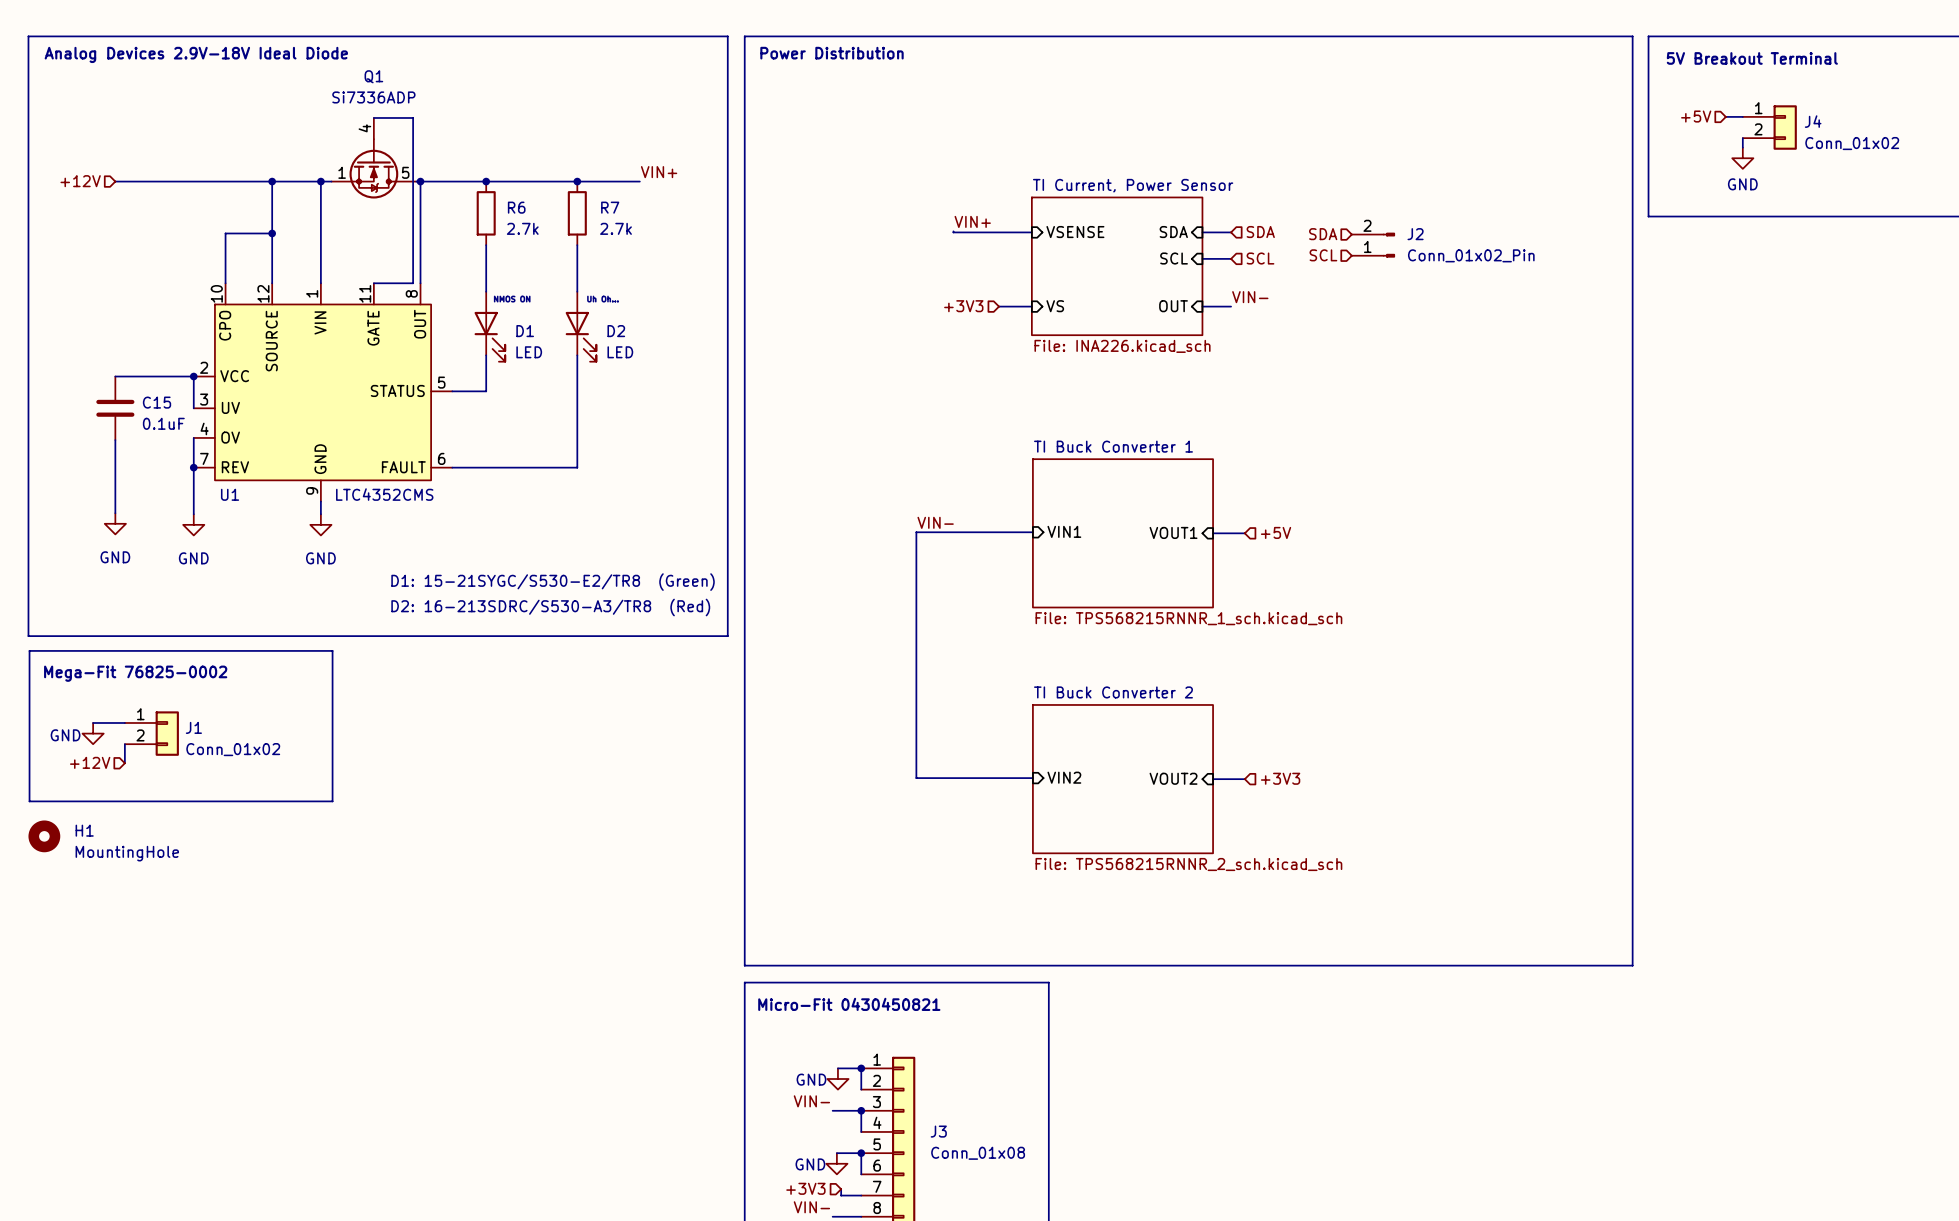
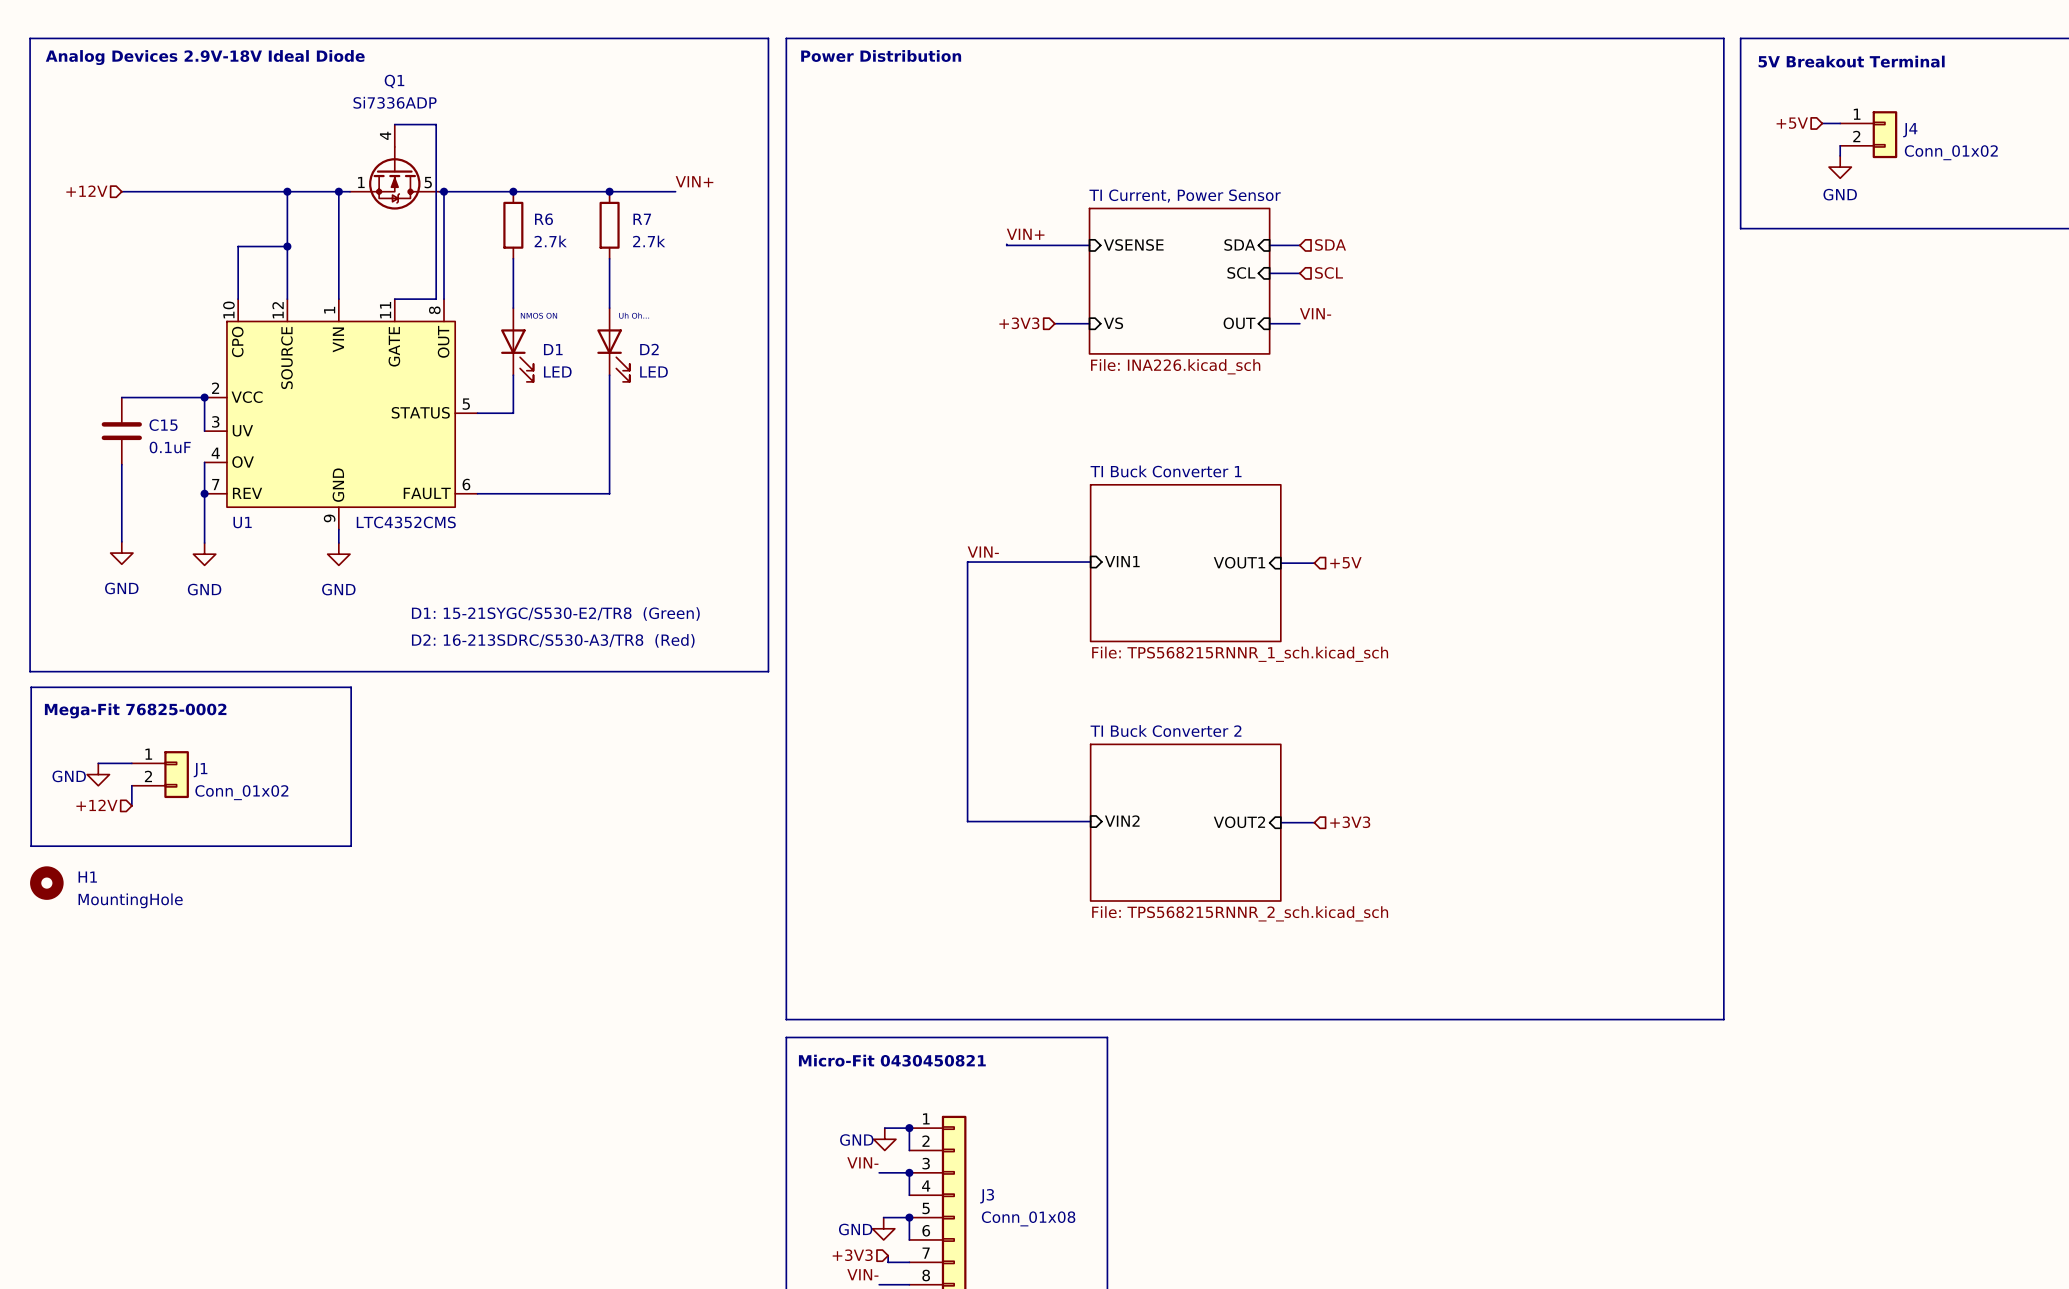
hierarchical label: SDA (1323, 234) -> none
J2: Conn_01x02_Pin (1373, 245) -> none
hierarchical label: SCL (1323, 255) -> none

